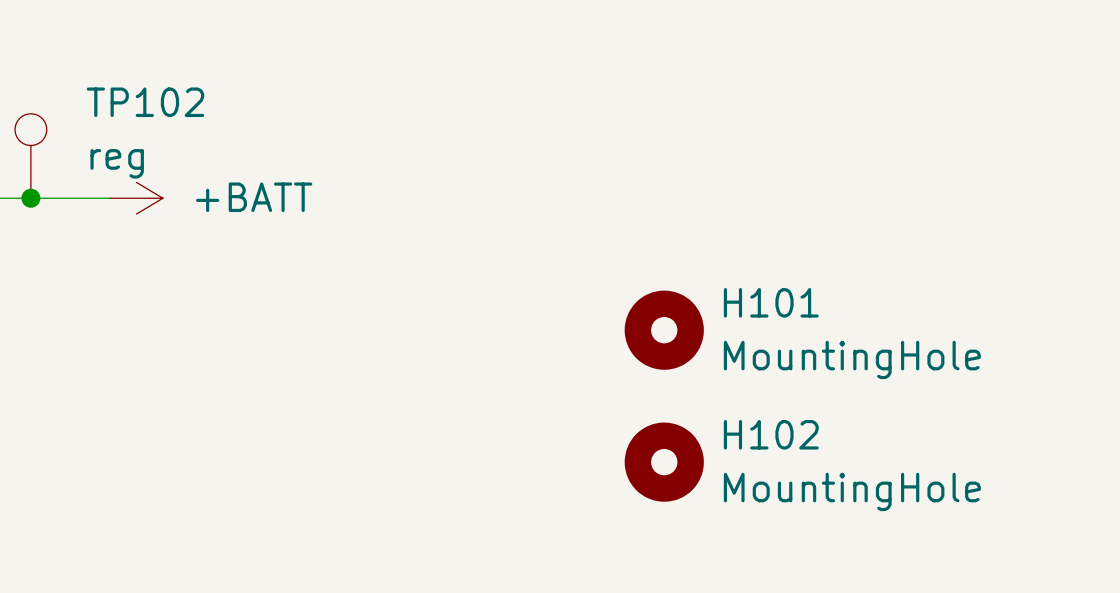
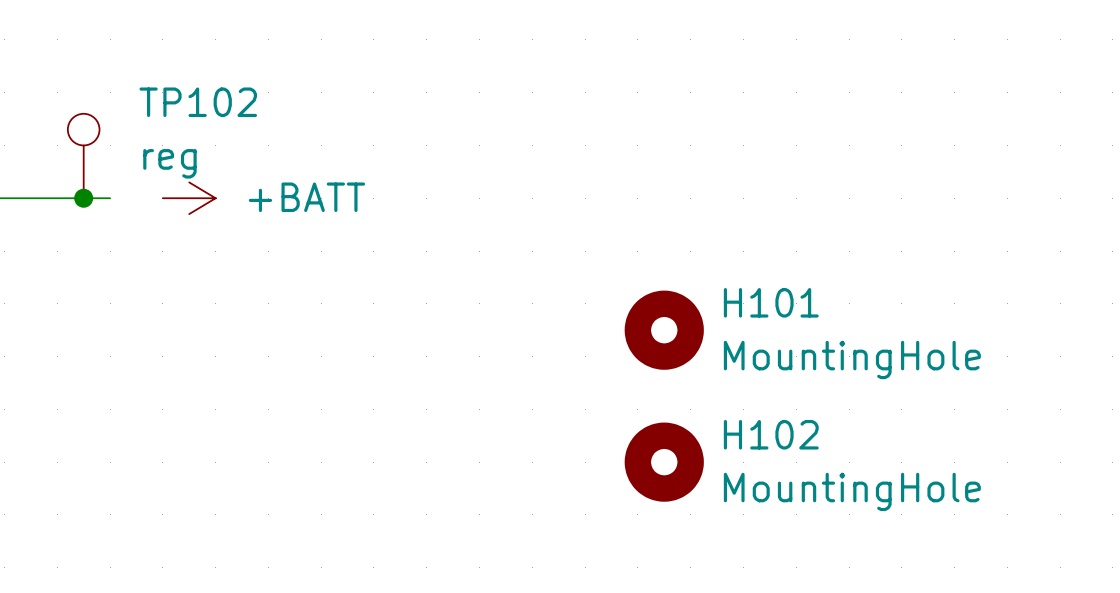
TP102 position: (30, 156) -> (83, 156)
junction position: (30, 198) -> (83, 198)
power symbol position: +BATT (136, 198) -> +BATT (189, 198)

